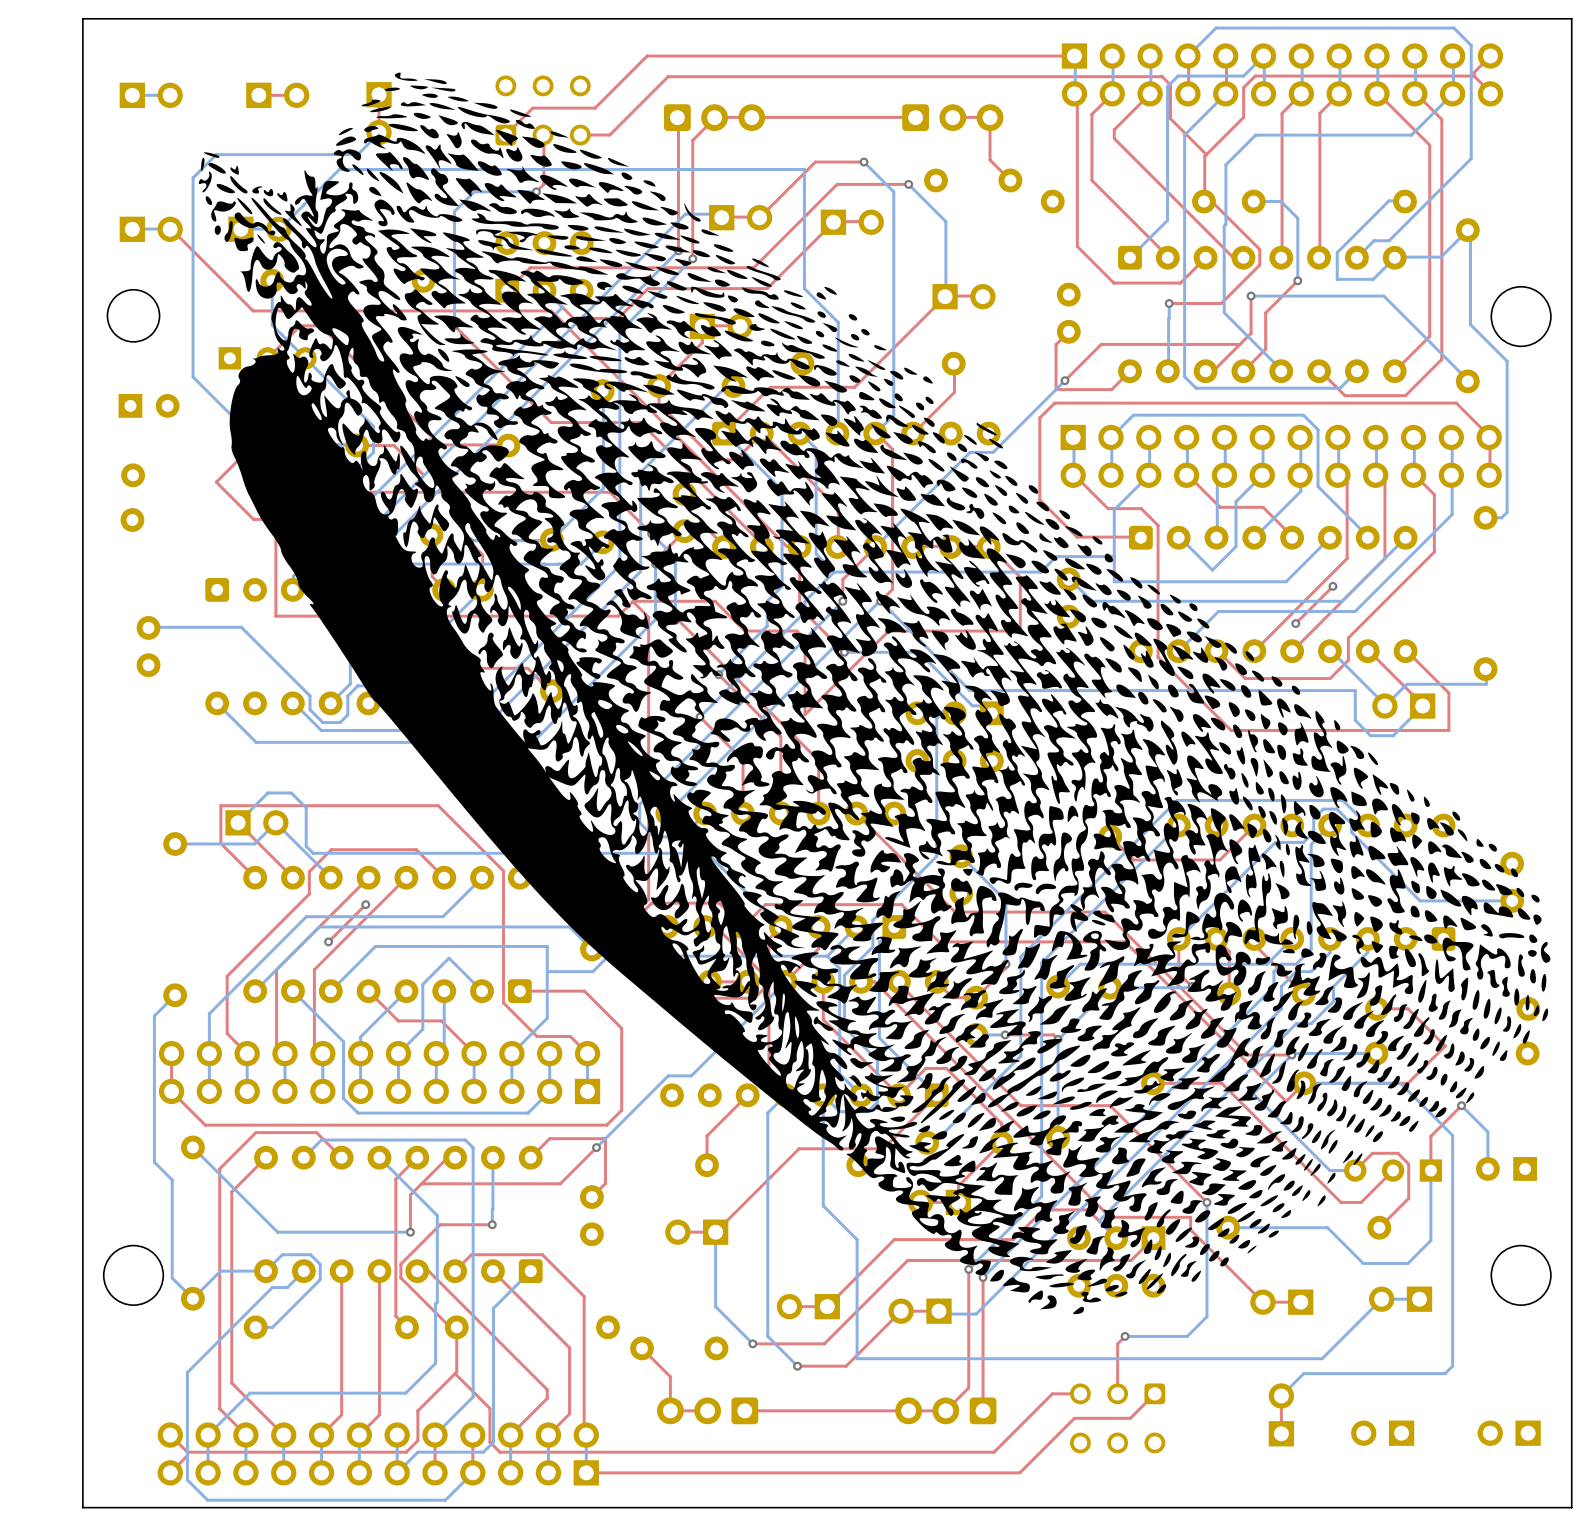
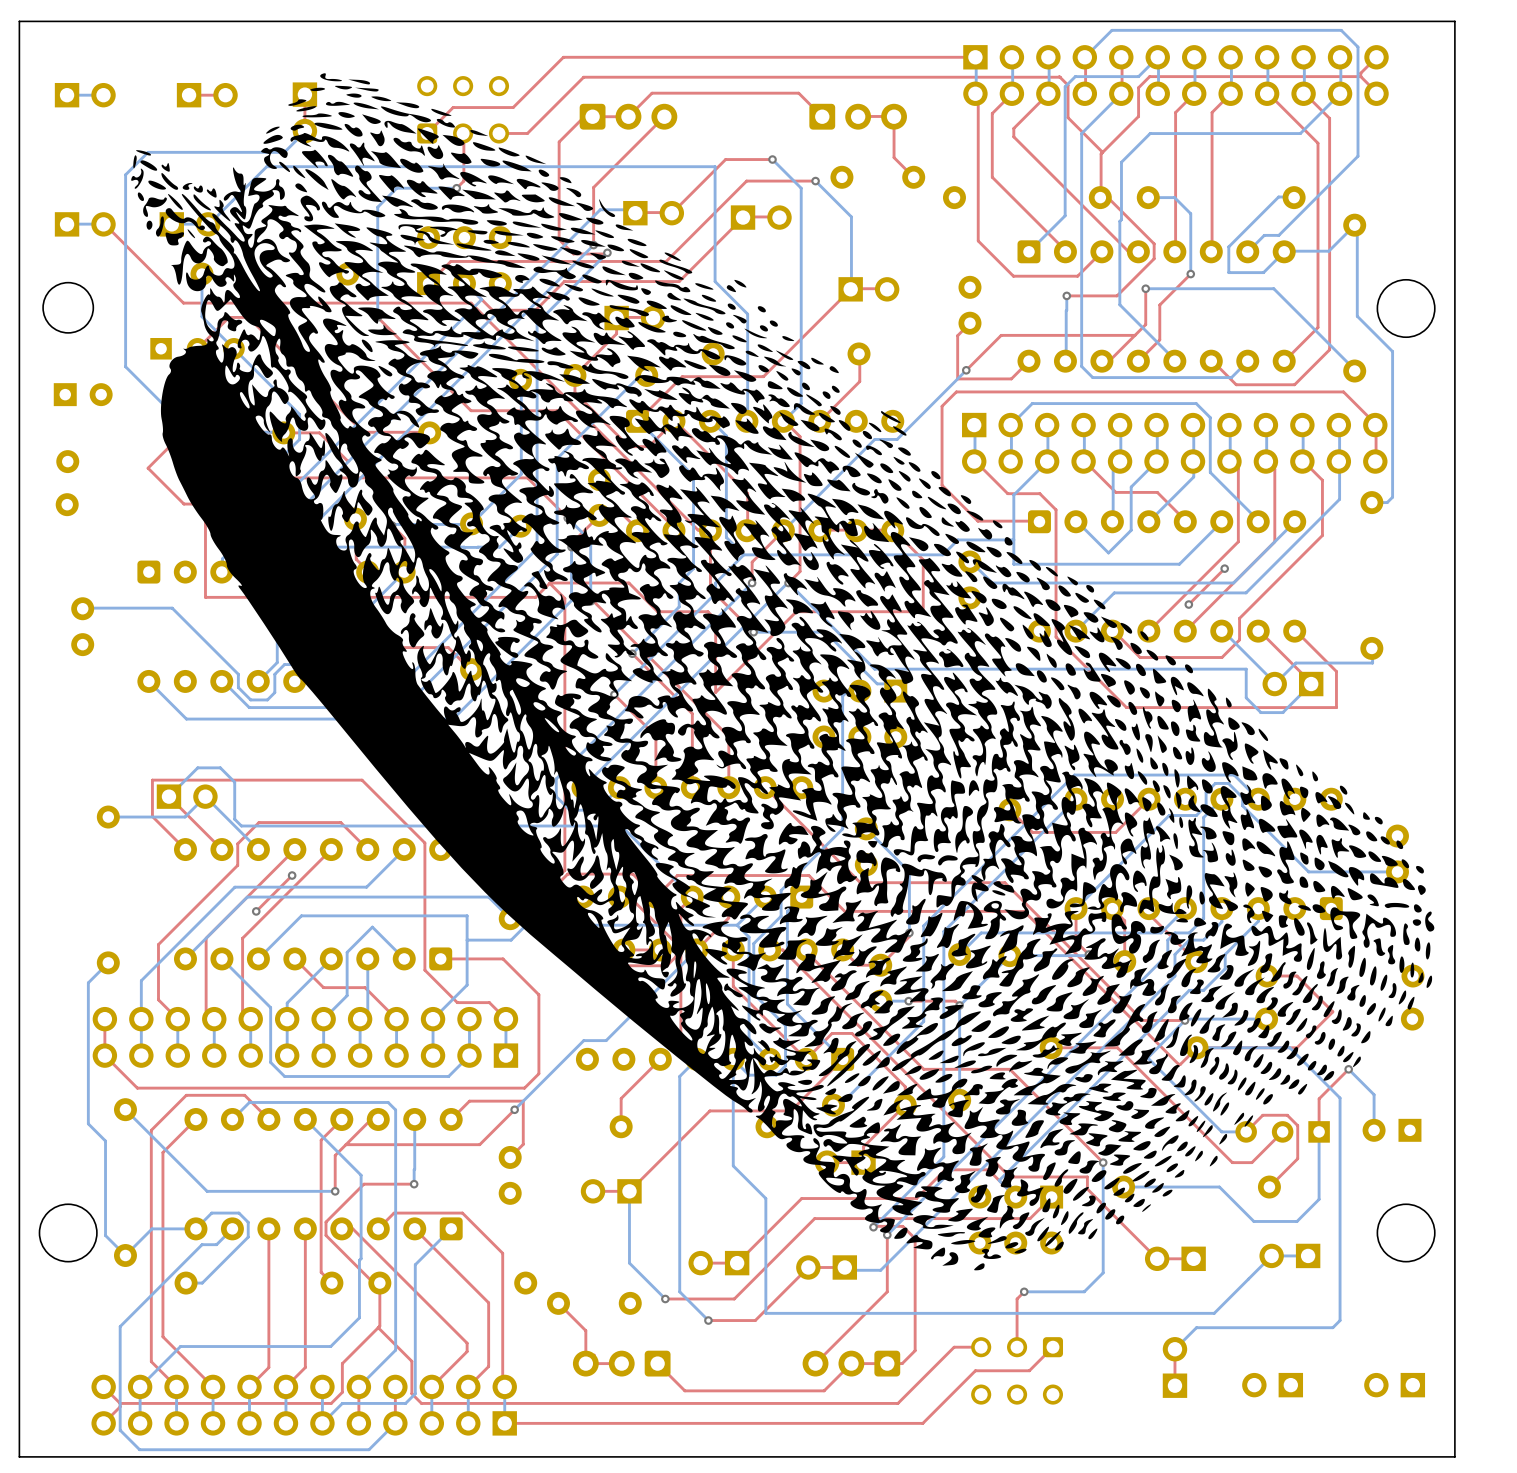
top track: (678, 117) (678, 191) -> (664, 116) (593, 187)
top track: (916, 117) (715, 117) (692, 140) (692, 258) -> (822, 116) (798, 93) (652, 93) (628, 116) (584, 116) (559, 141) (559, 239) (573, 253) (607, 252)
top track: (968, 1269) (968, 1387) (945, 1410) (744, 1410) -> (873, 1227) (902, 1226) (915, 1238) (915, 1350) (902, 1363) (851, 1363) (824, 1390) (684, 1390) (657, 1363)
top track: (983, 1336) (983, 1410) -> (887, 1291) (815, 1363)

